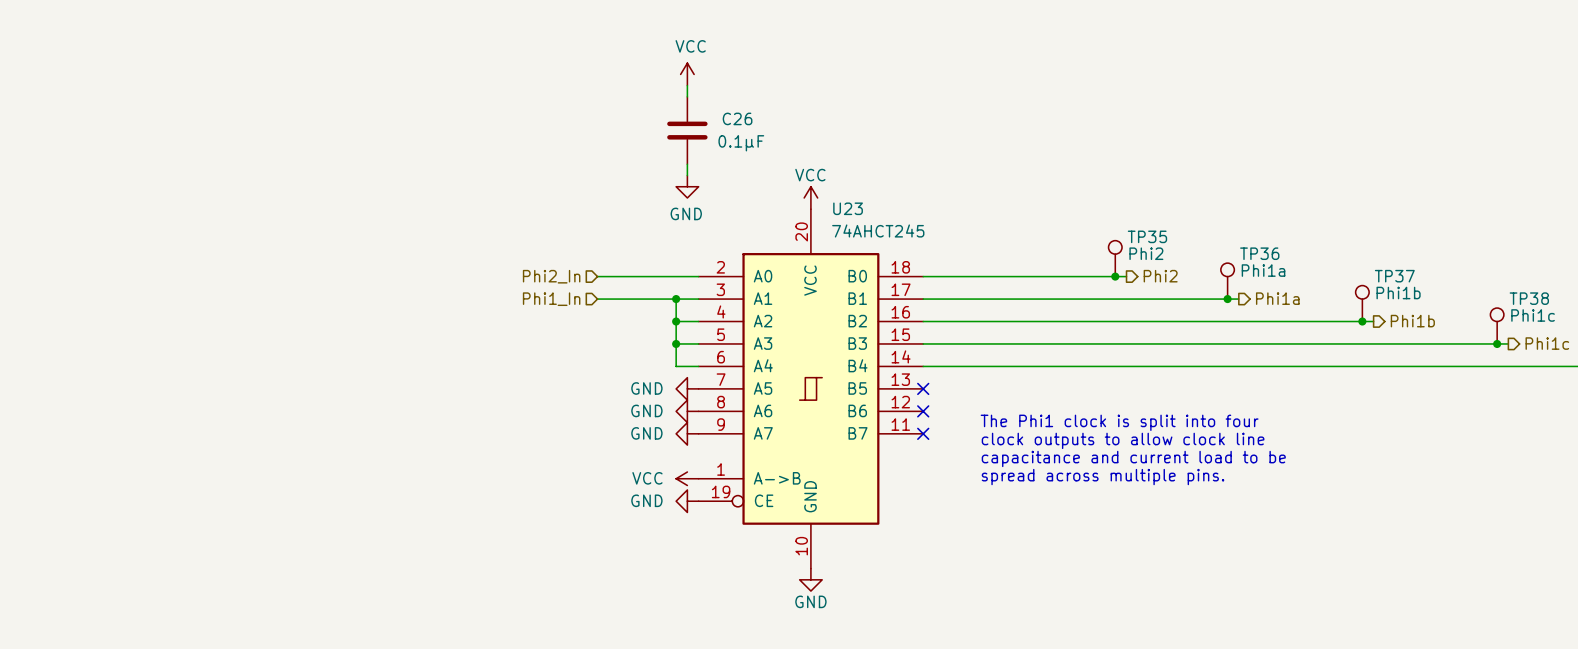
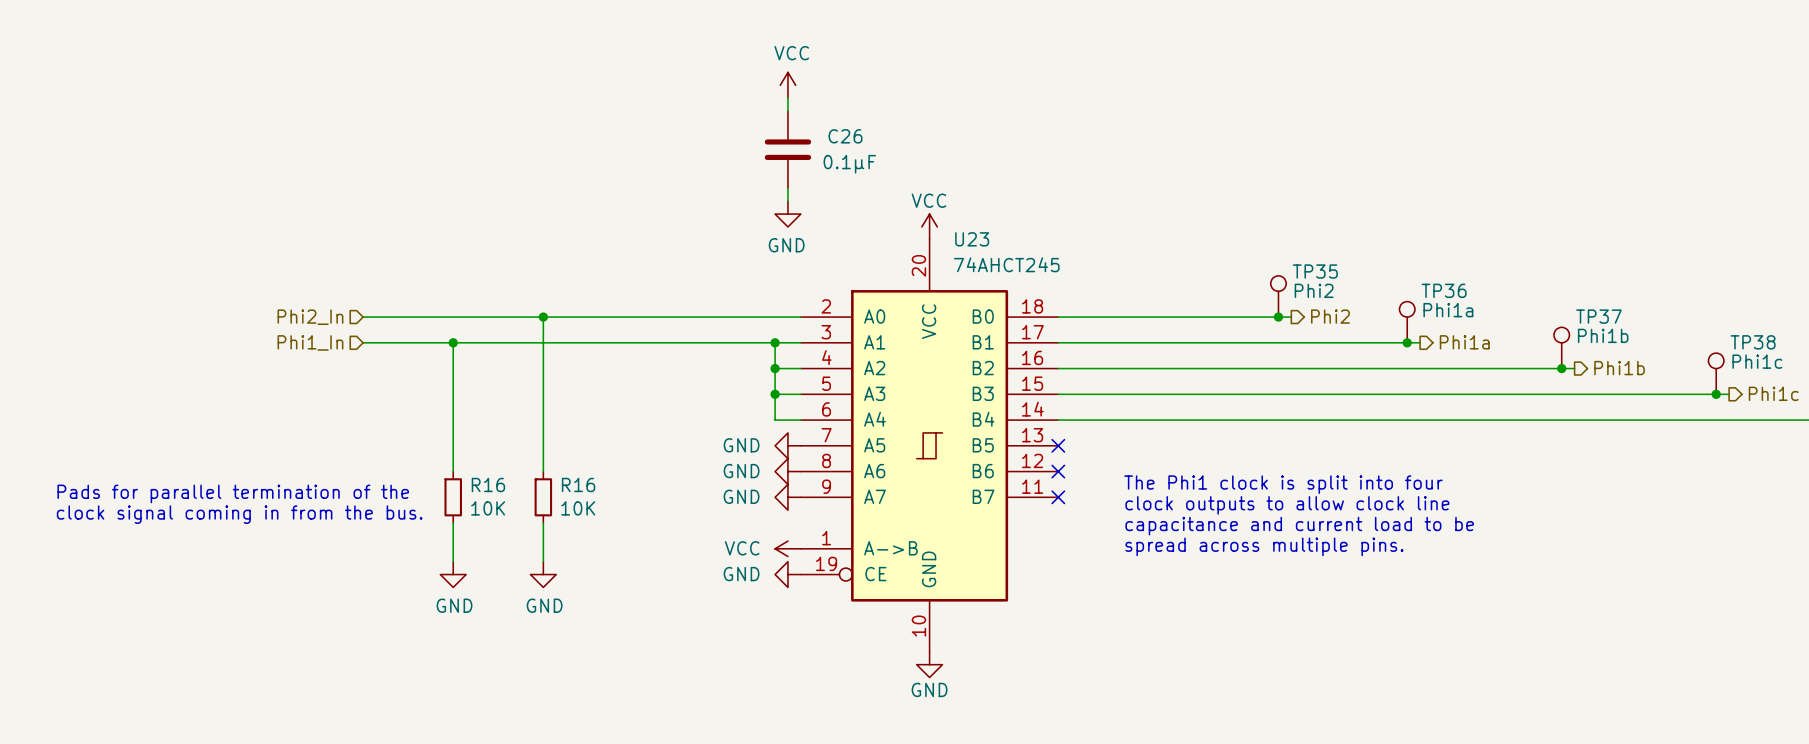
hierarchical label: none -> Phi2_In (310, 317)
wire: none -> (363, 317) (684, 317)
wire: none -> (543, 317) (543, 471)
junction: none -> (543, 317)
hierarchical label: Phi2_In (551, 276) -> none
hierarchical label: none -> Phi1_In (310, 342)
wire: none -> (363, 342) (684, 342)
wire: none -> (453, 342) (453, 471)
junction: none -> (453, 342)
hierarchical label: Phi1_In (551, 299) -> none
text: none -> Pads for parallel termination of the (233, 493)
R16: none -> 10K (453, 497)
R16: none -> 10K (543, 497)
text: none -> clock signal coming in from the bus. (239, 514)
wire: none -> (453, 523) (453, 561)
wire: none -> (543, 523) (543, 561)
power symbol: none -> GND (453, 574)
power symbol: none -> GND (543, 574)

